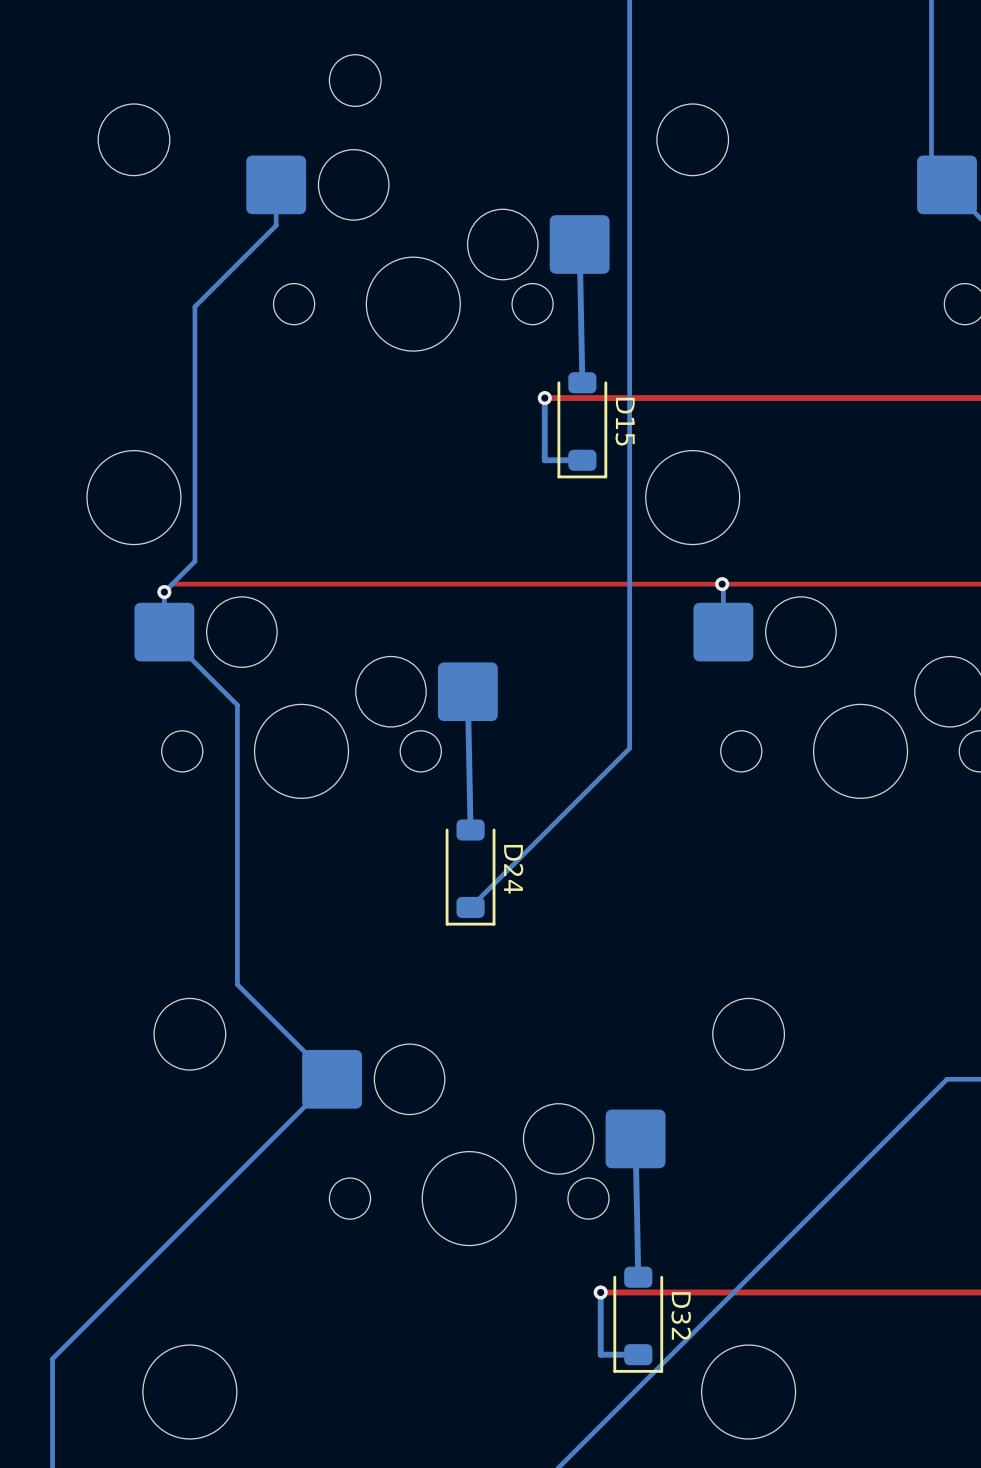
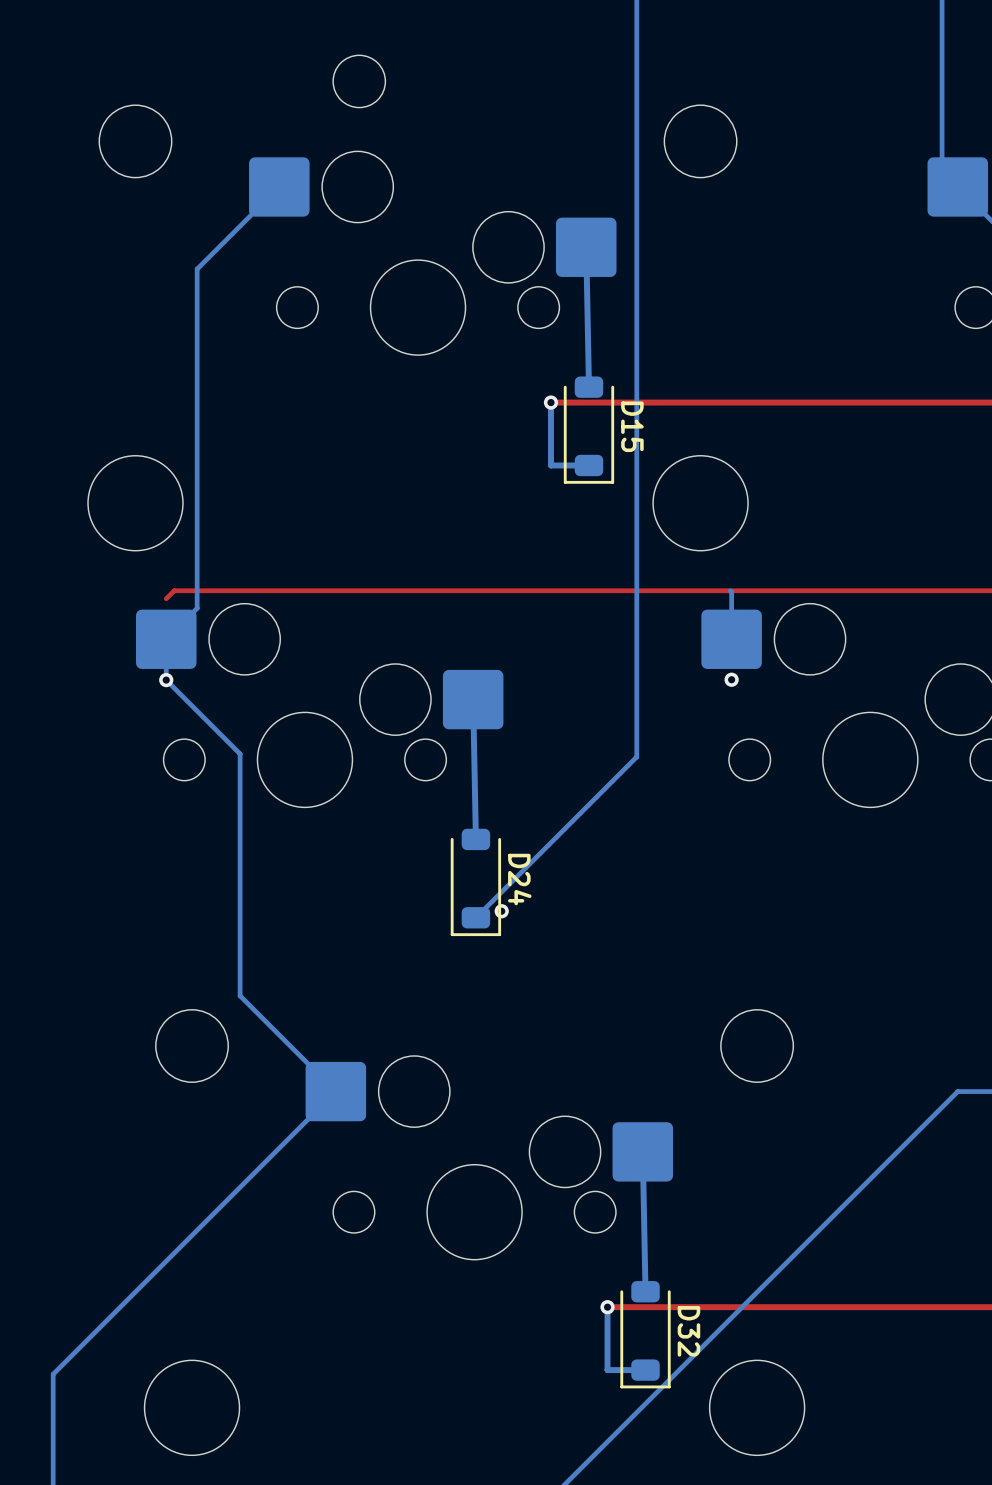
bottom track: (276, 184) (276, 225) (194, 306) -> (279, 186) (197, 269) (197, 310)
bottom track: (194, 561) (164, 592) (164, 632) (237, 705) (237, 745) -> (197, 567) (197, 608) (166, 639) (166, 680) (240, 753)
via position: (722, 584) -> (731, 679)
via position: (164, 592) -> (166, 680)
via: none -> (501, 911)

